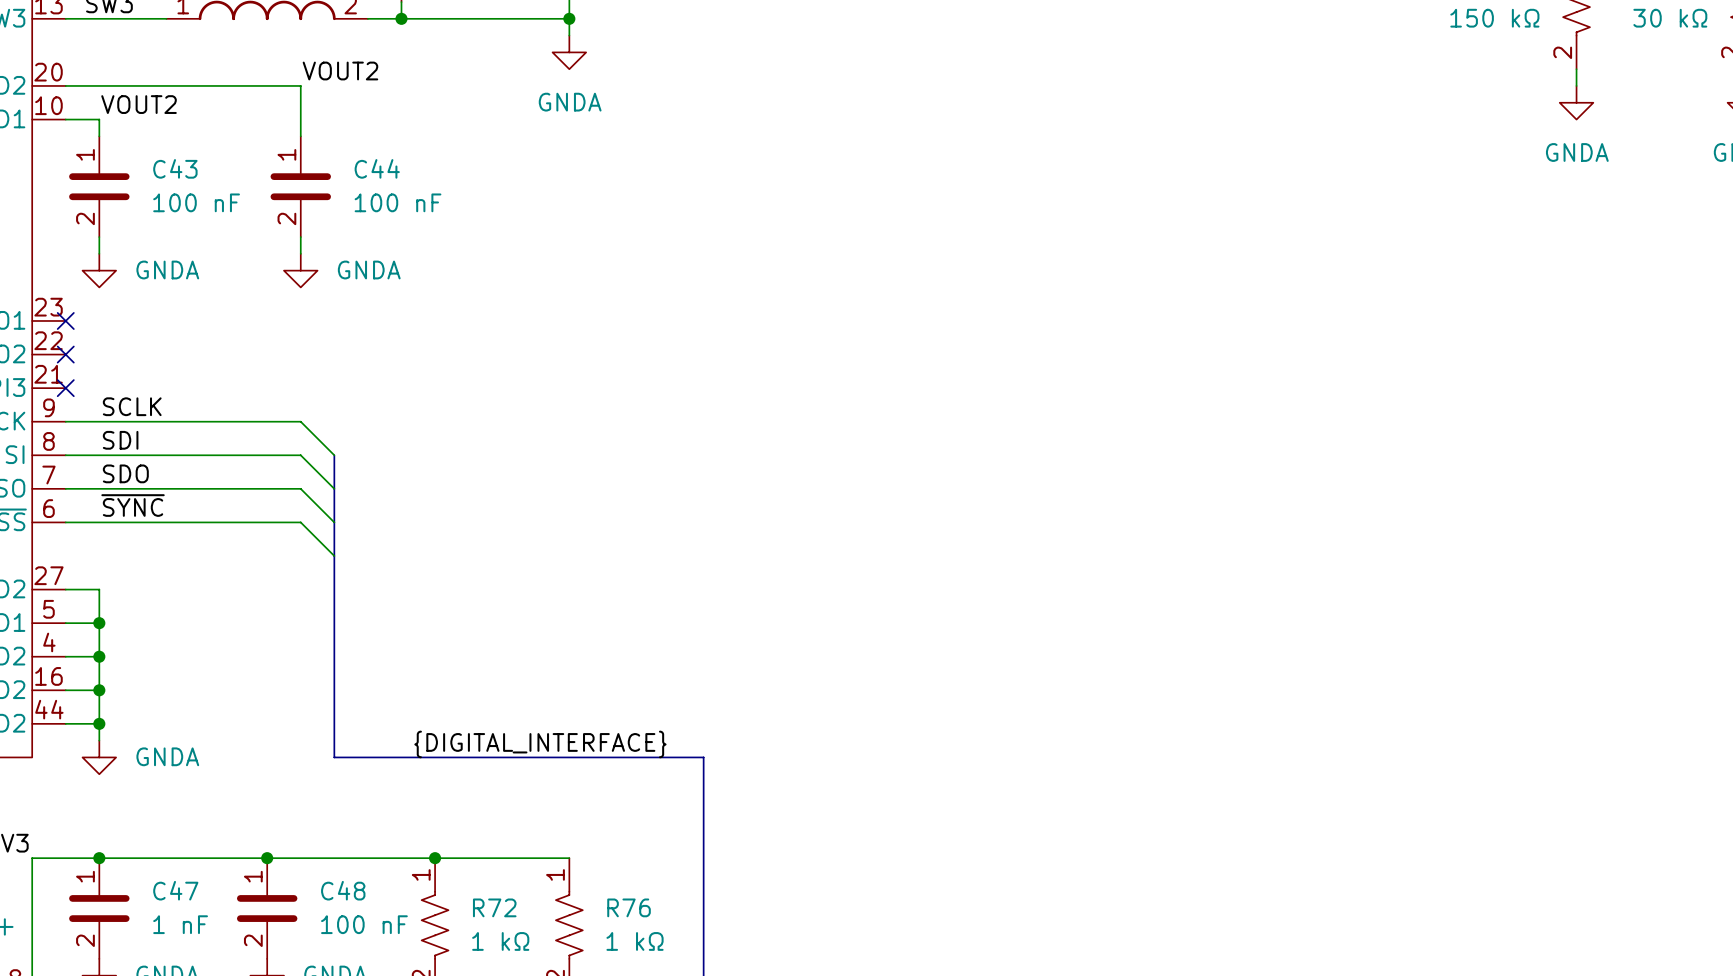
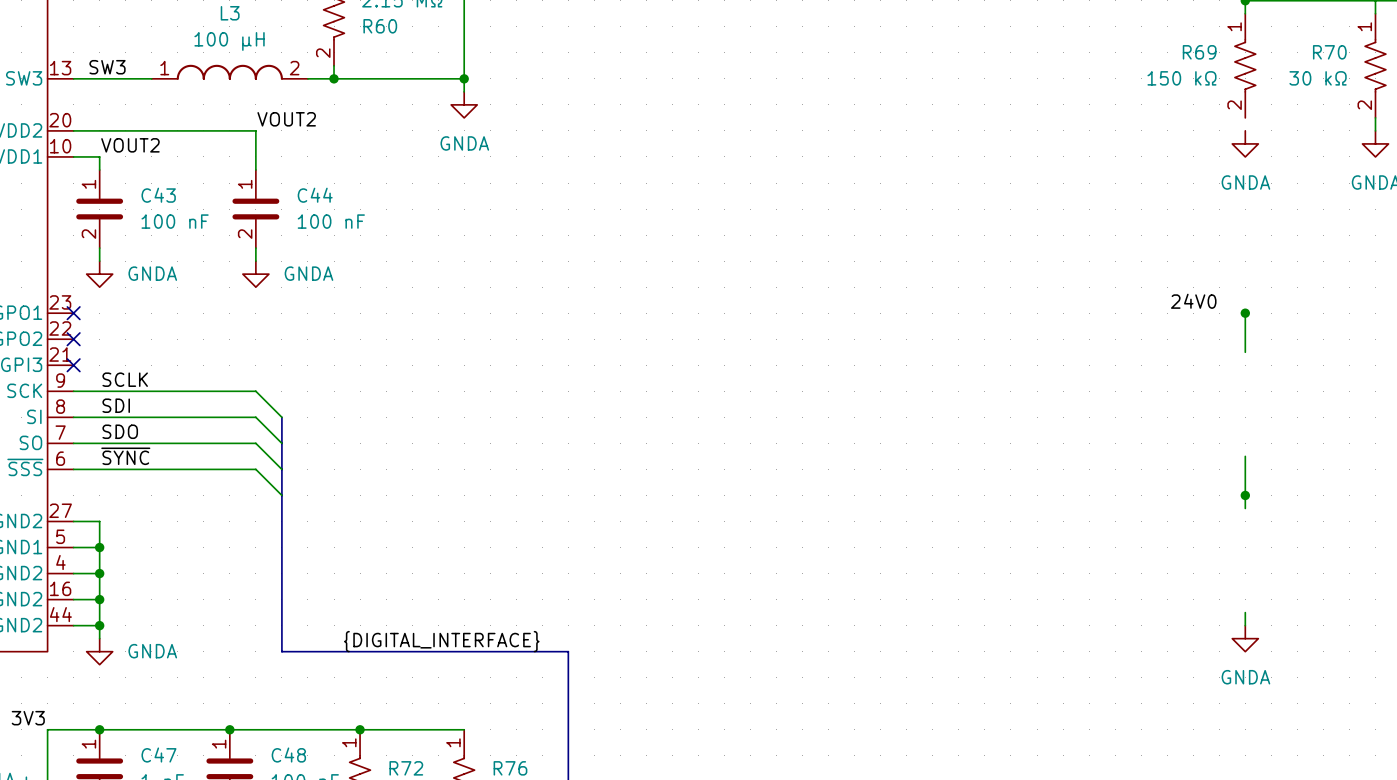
wire: (1576, 69) (1576, 85) -> none
label: none -> 24V0 (1193, 301)
wire: none -> (1245, 313) (1245, 352)
junction: none -> (1245, 313)
wire: none -> (1245, 456) (1245, 508)
junction: none -> (1245, 495)
wire: none -> (1245, 612) (1245, 625)
power symbol: none -> GNDA (1245, 638)

